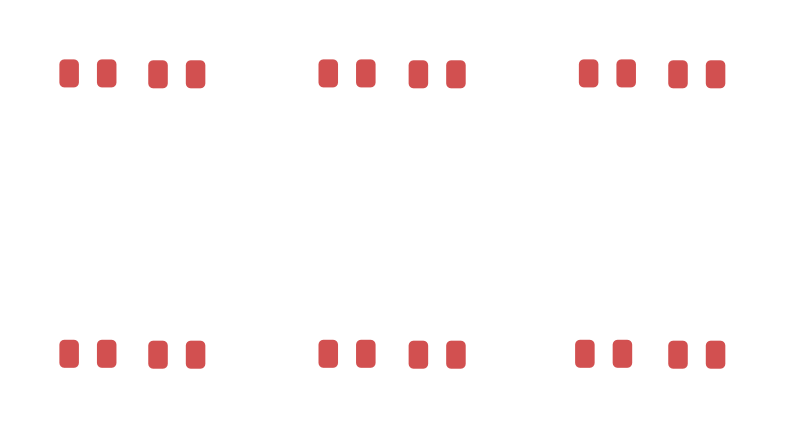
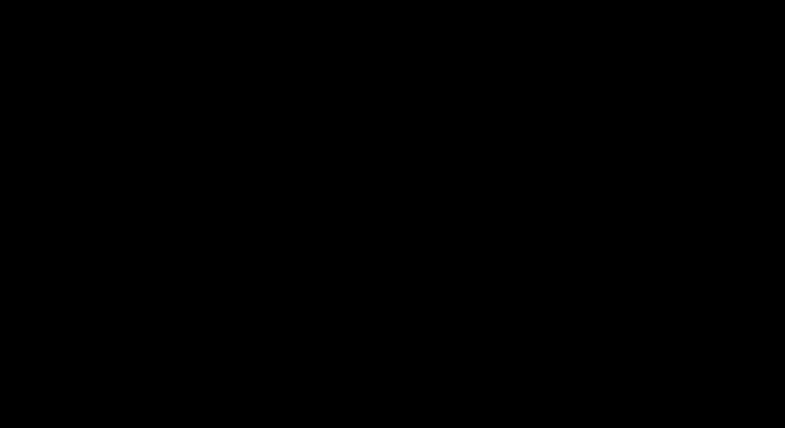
part: (87, 73) -> none
part: (347, 73) -> none
part: (607, 73) -> none
part: (176, 74) -> none
part: (437, 74) -> none
part: (696, 74) -> none
part: (87, 353) -> none
part: (347, 353) -> none
part: (603, 353) -> none
part: (176, 354) -> none
part: (437, 354) -> none
part: (696, 354) -> none

